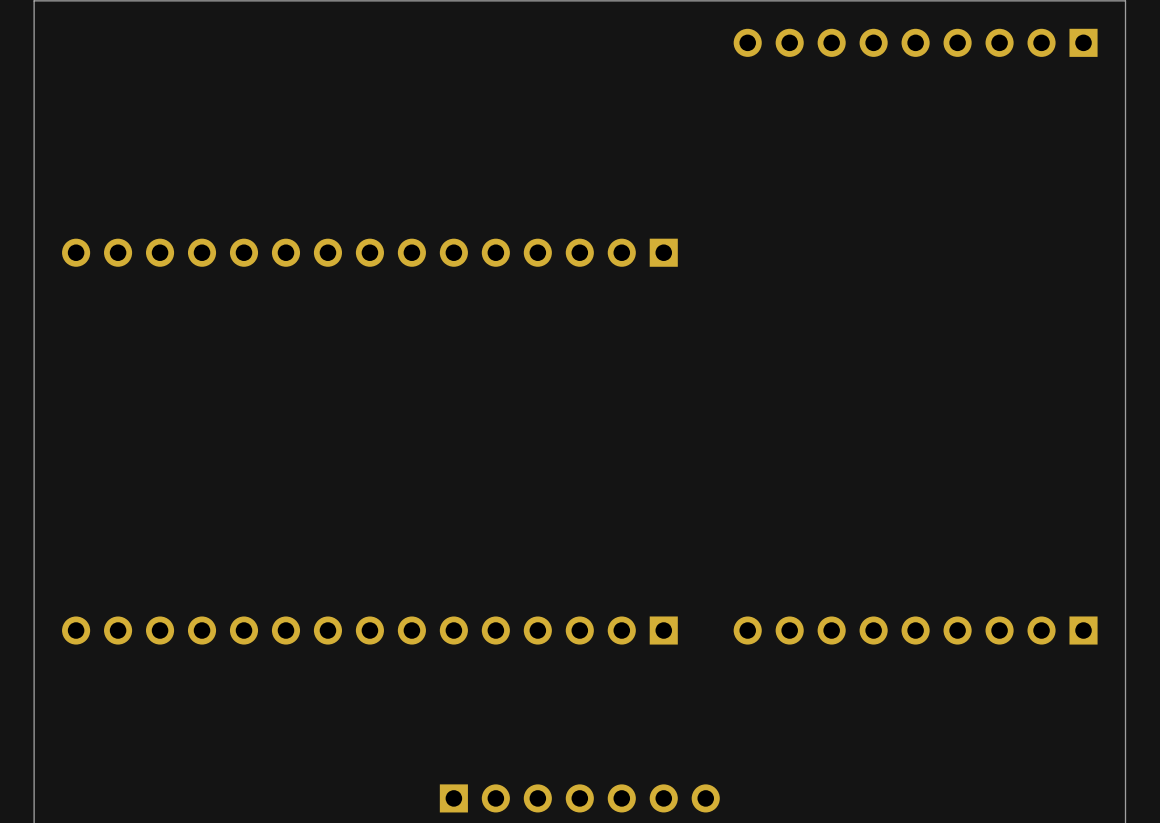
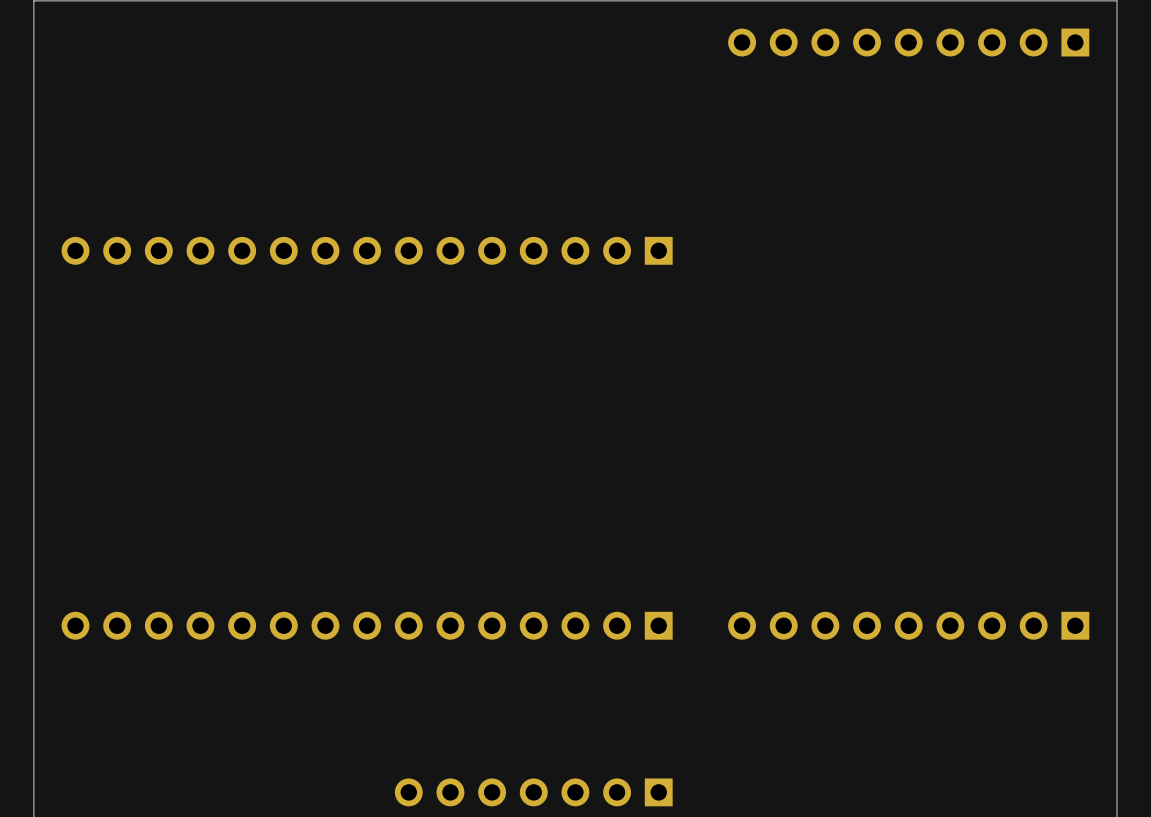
part rotation: 0° (579, 798) -> 180° (533, 792)

